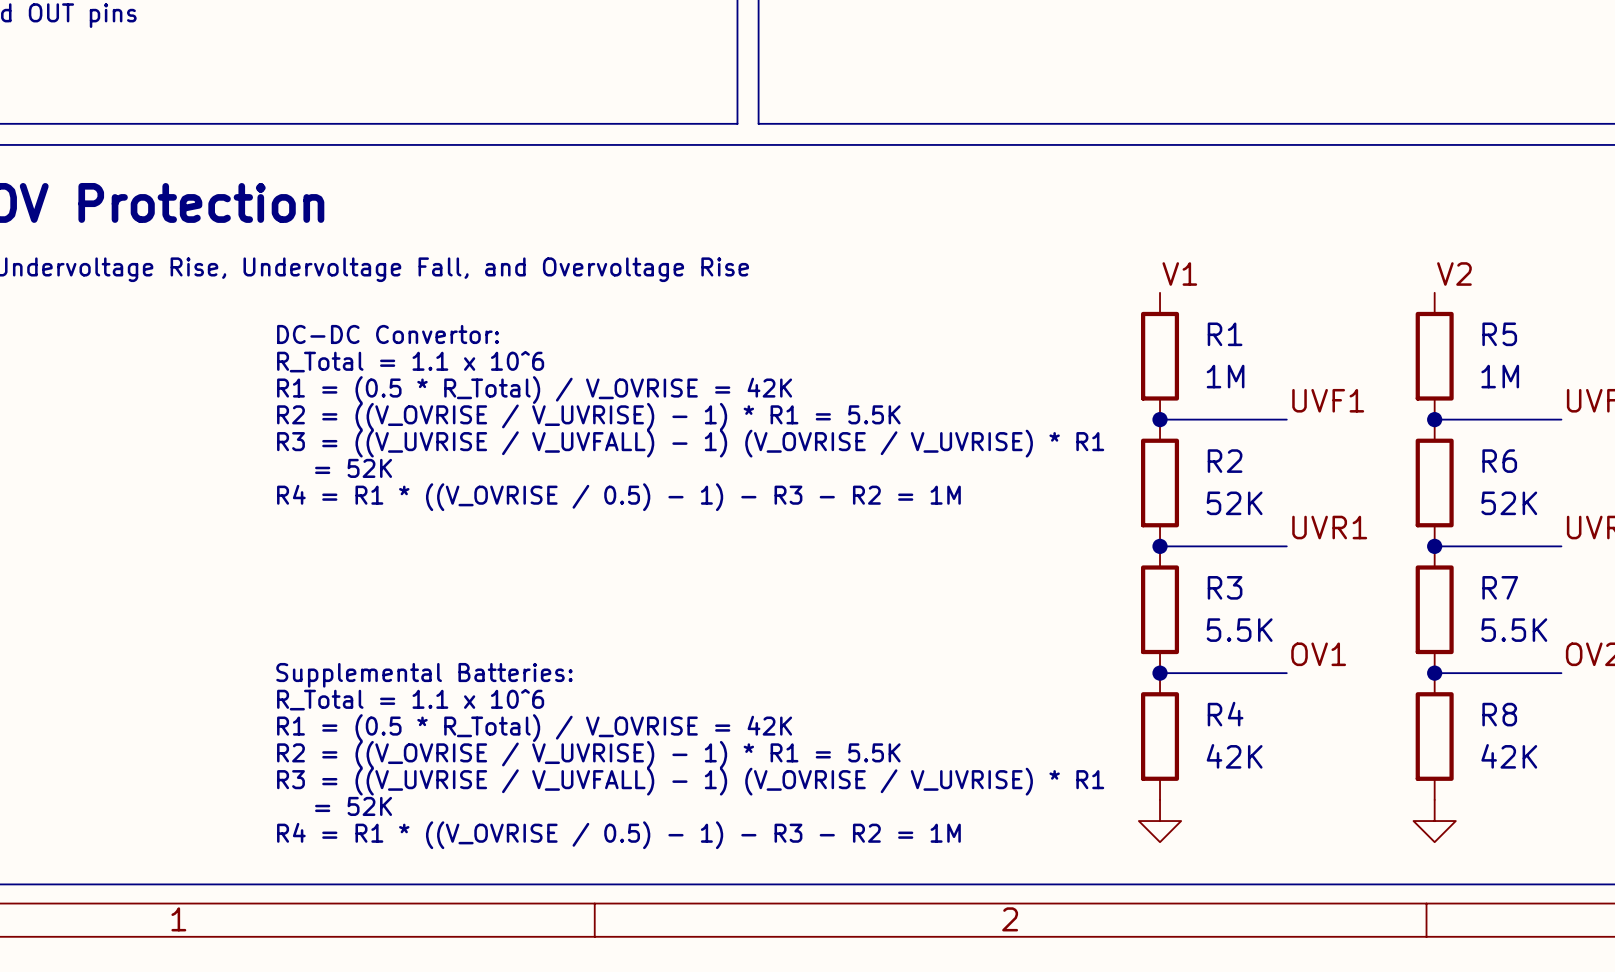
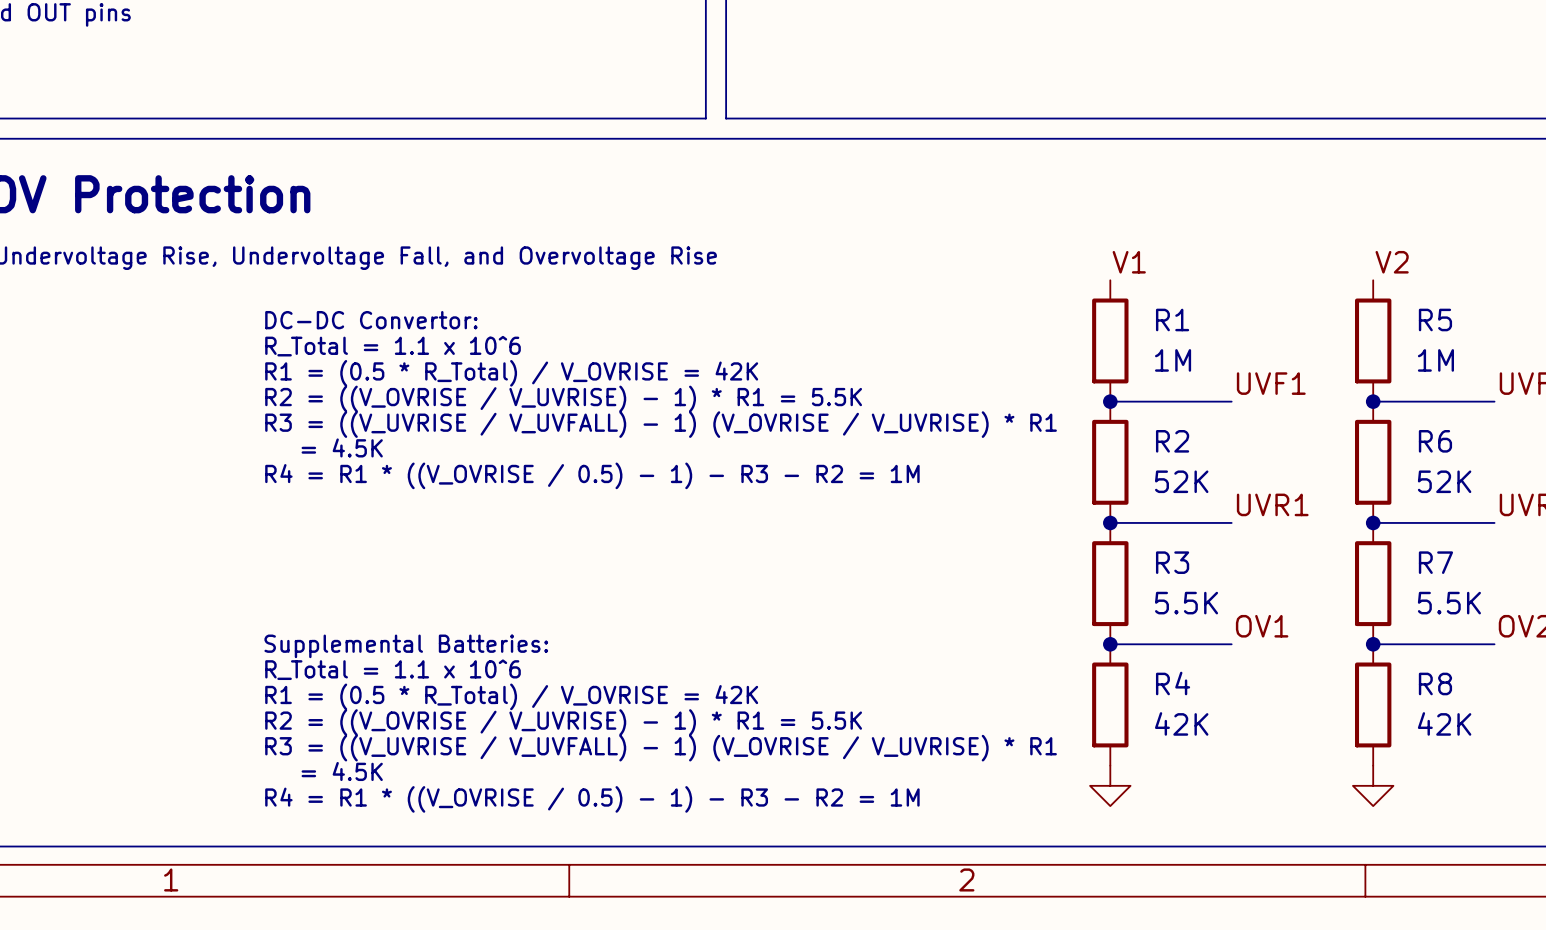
text: = 52K (353, 468) -> = 4.5K (342, 447)
text: = 52K (353, 806) -> = 4.5K (342, 771)

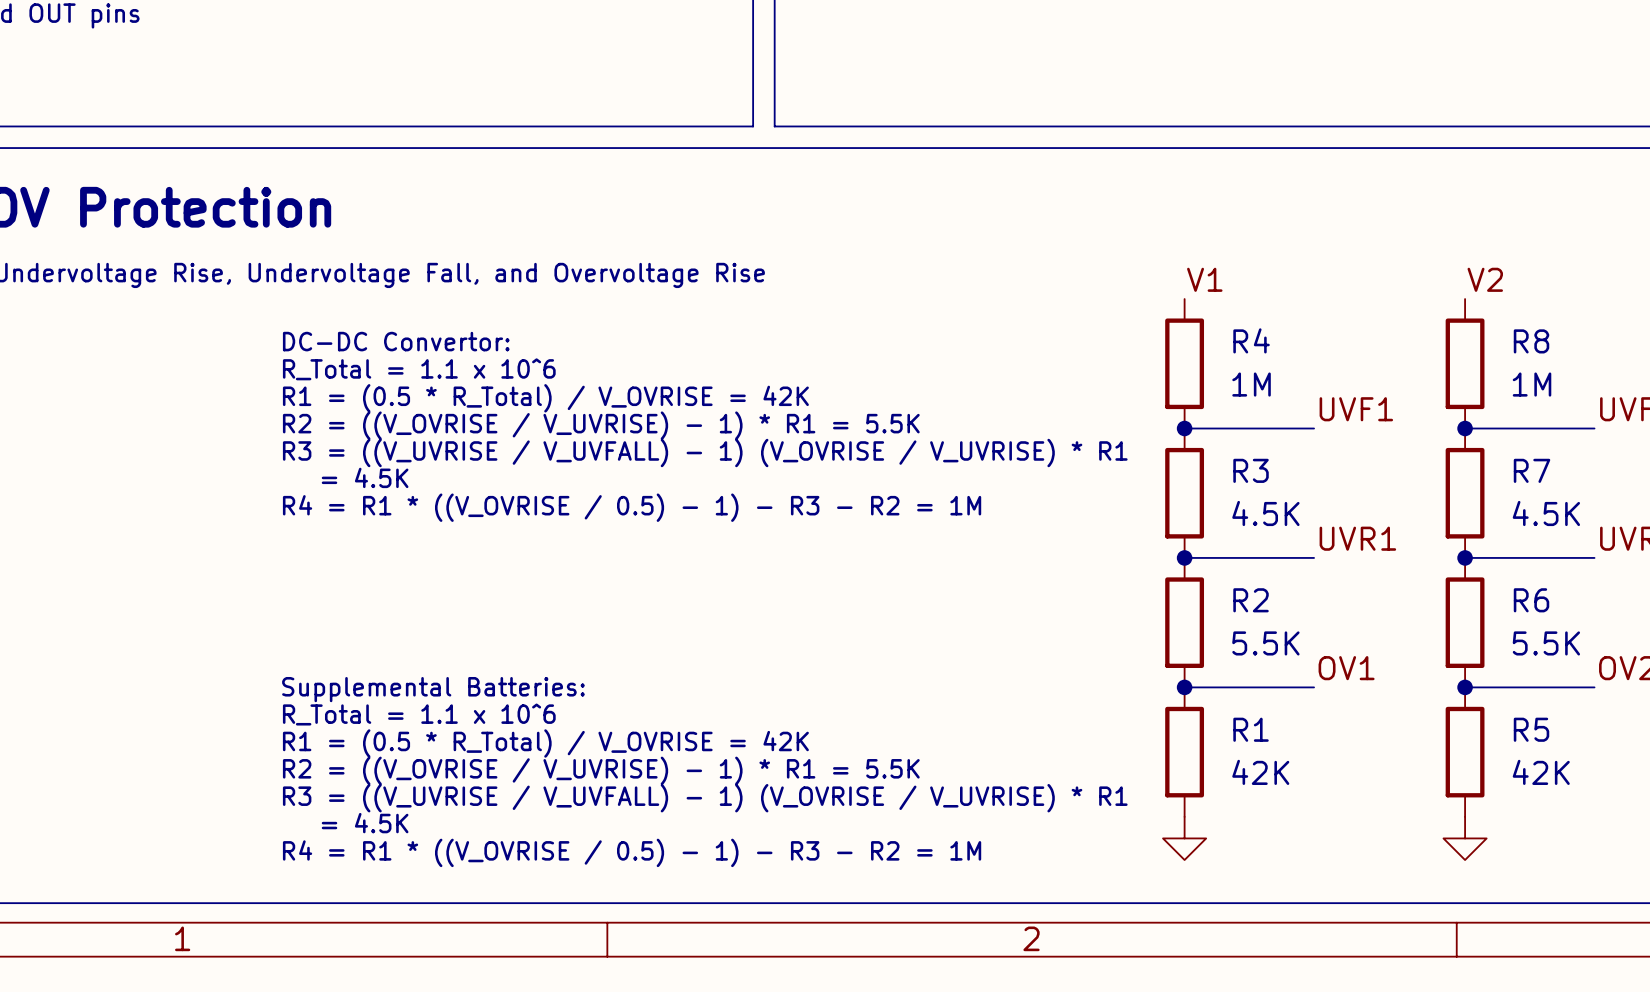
R1 name: R1 (1172, 319) -> R4 (1251, 340)
R5 name: R5 (1435, 319) -> R8 (1531, 341)
R2 name: R2 (1172, 441) -> R3 (1251, 470)
R6 name: R6 (1435, 441) -> R7 (1532, 470)
R2 value: 52K (1181, 481) -> 4.5K (1265, 513)
R6 value: 52K (1444, 481) -> 4.5K (1546, 513)
R3 name: R3 (1172, 562) -> R2 (1251, 600)
R7 name: R7 (1435, 562) -> R6 (1531, 600)
R4 name: R4 (1173, 683) -> R1 (1251, 729)
R8 name: R8 (1435, 683) -> R5 (1531, 729)

